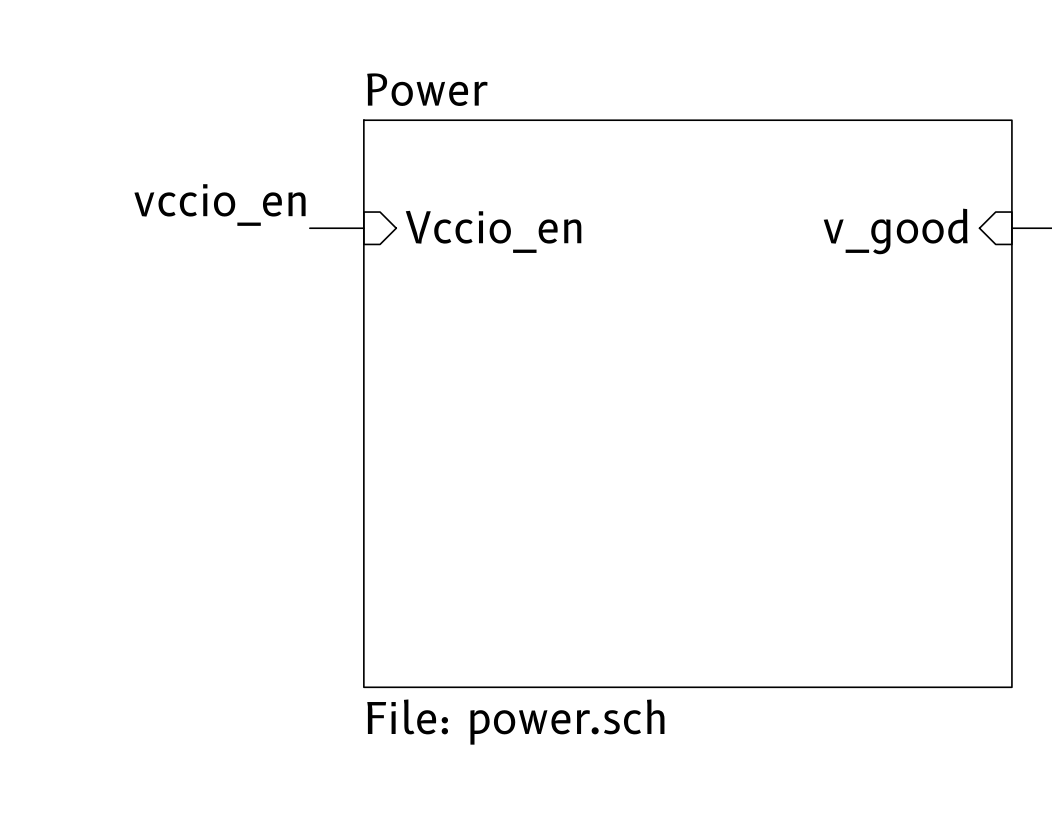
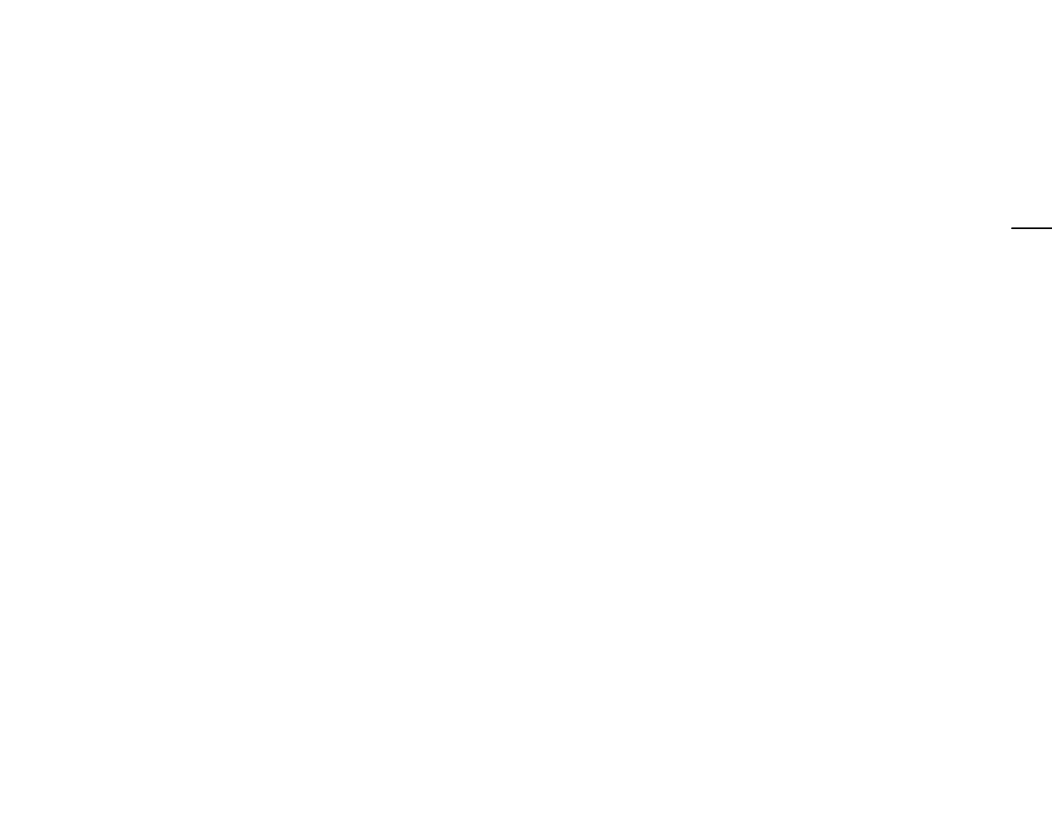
label: vccio_en (220, 205) -> none
wire: (309, 228) (363, 228) -> none
sheet pin: Vccio_en (493, 231) -> none
sheet pin: v_good (895, 231) -> none
sheet Power: File: power.sch (687, 403) -> none

